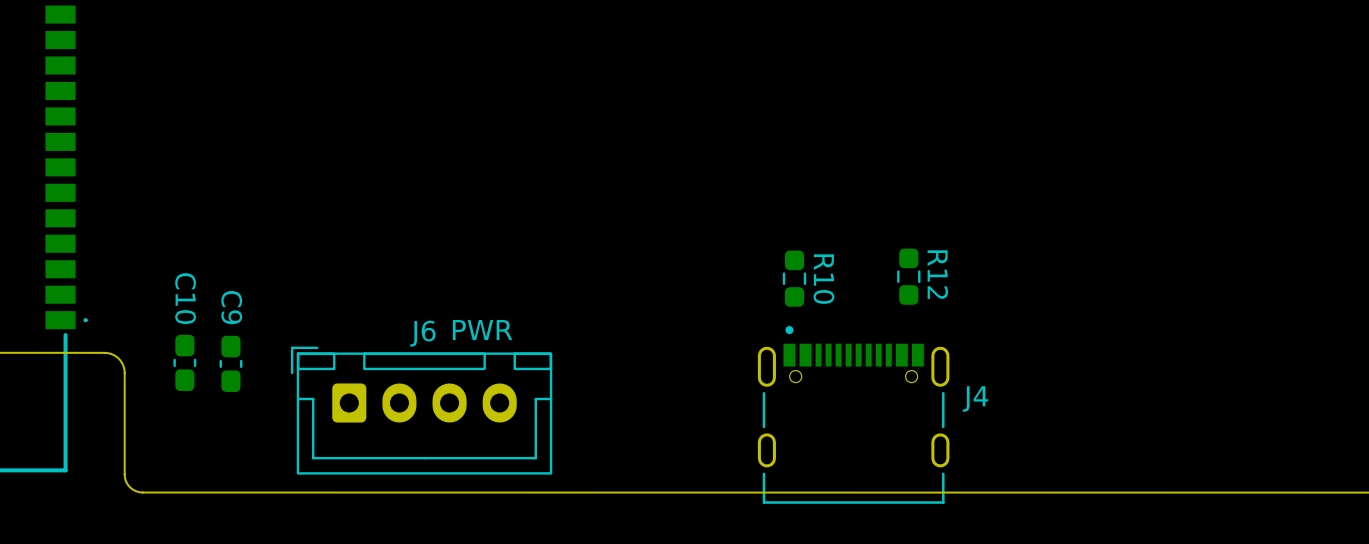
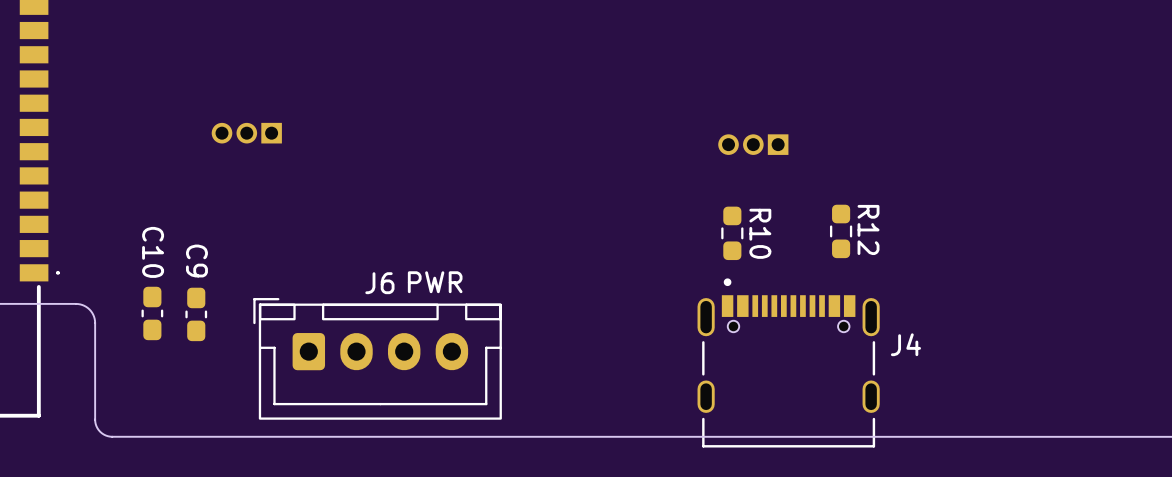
part: none -> (246, 133)
part: none -> (753, 144)

